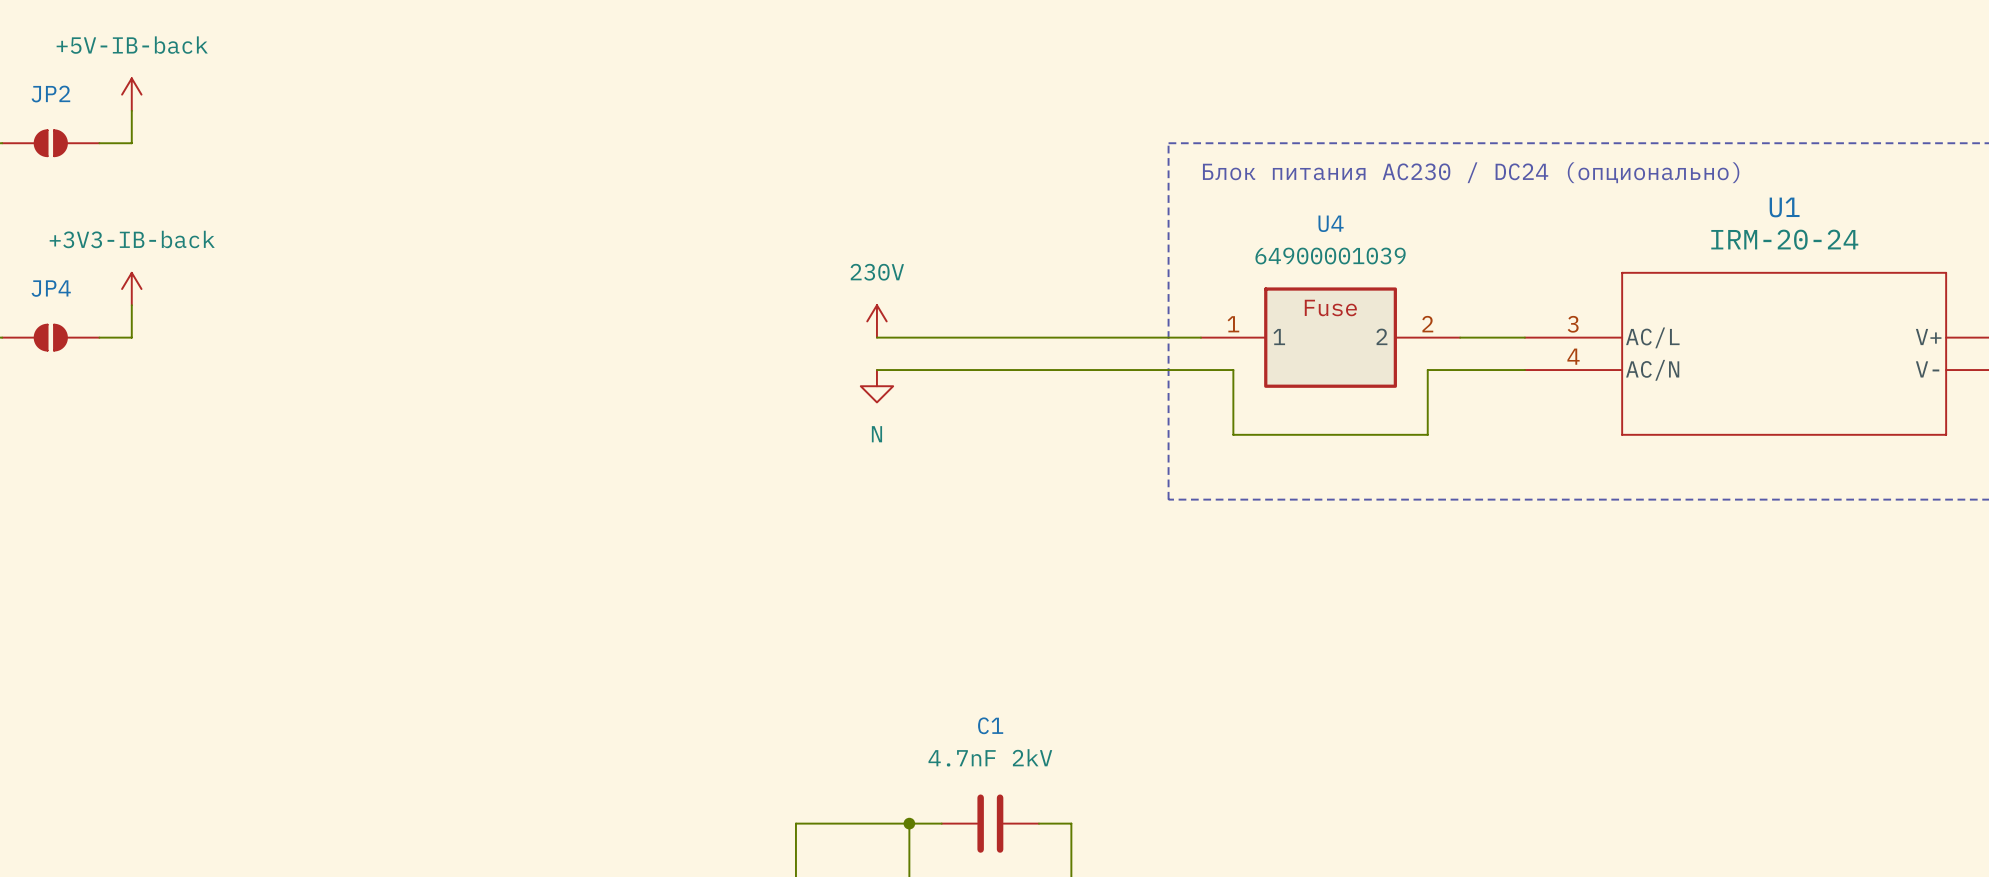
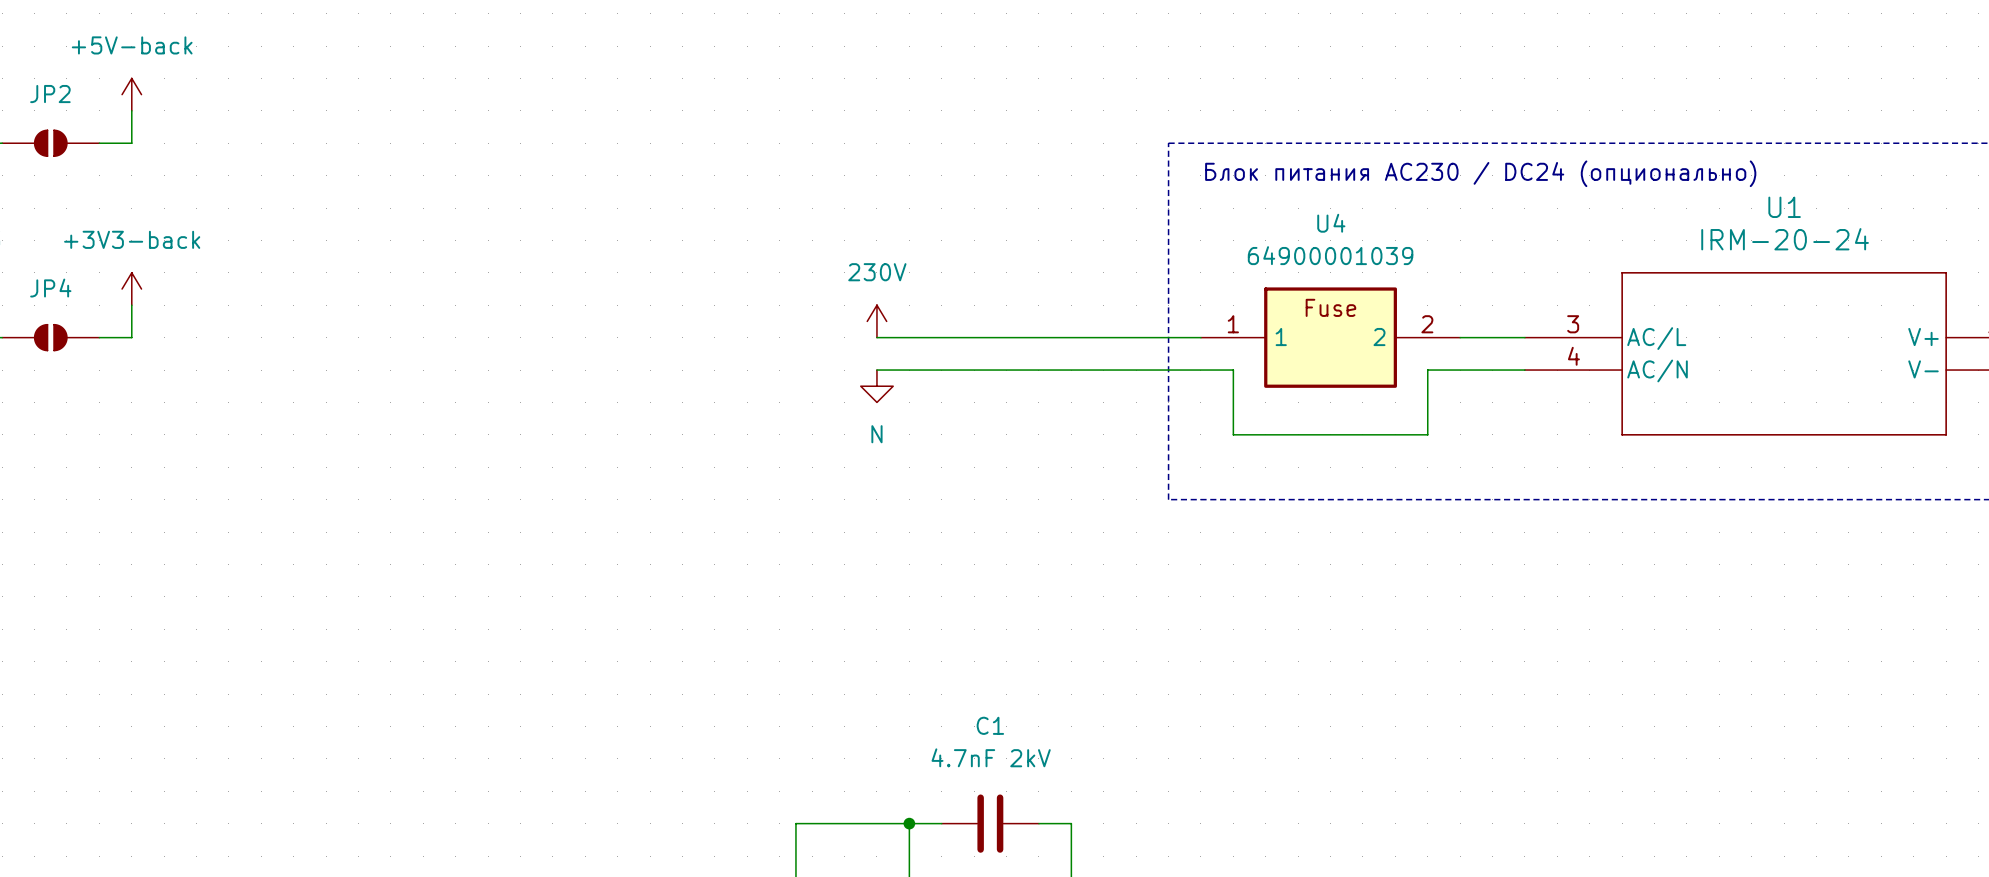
power symbol: +5V-IB-back (131, 94) -> +5V-back (131, 94)
power symbol: +3V3-IB-back (131, 289) -> +3V3-back (131, 289)

